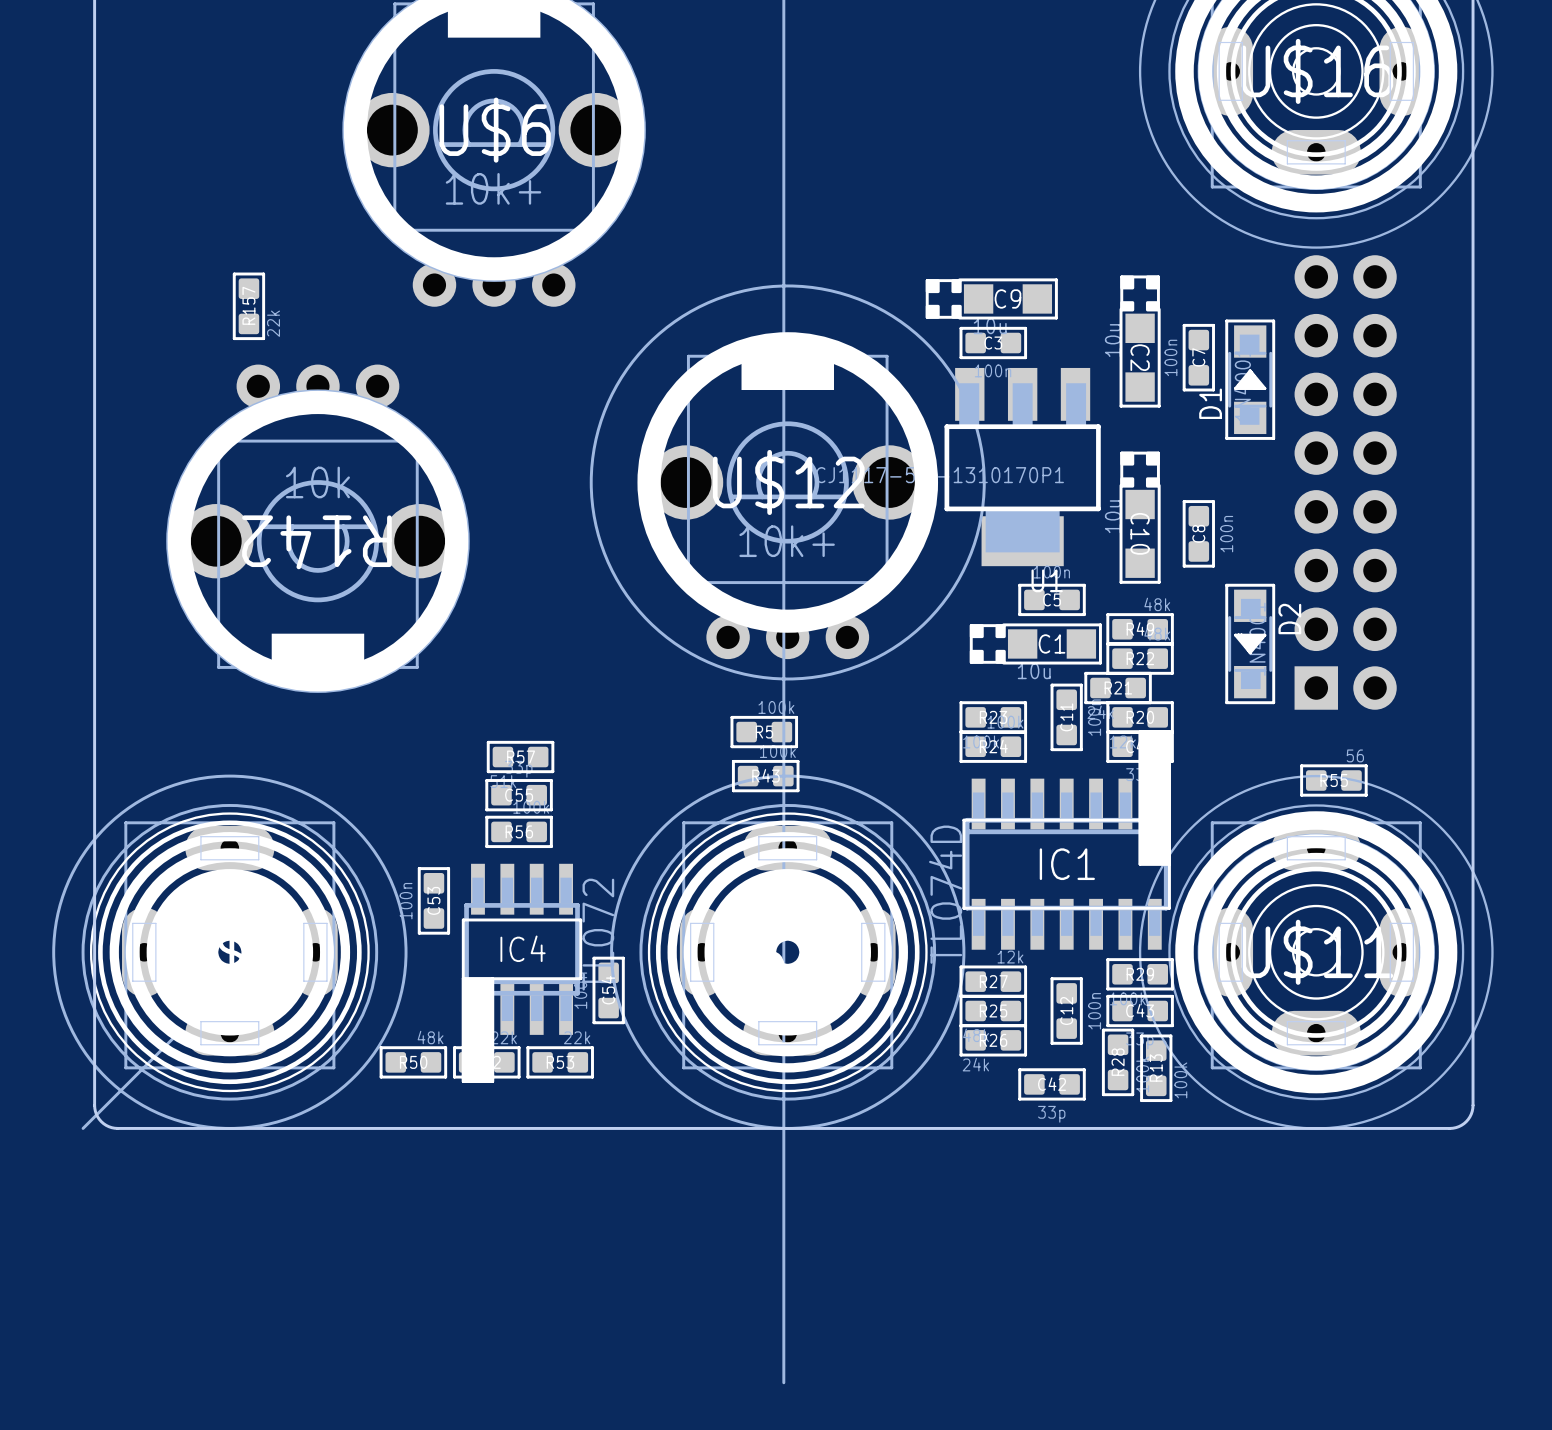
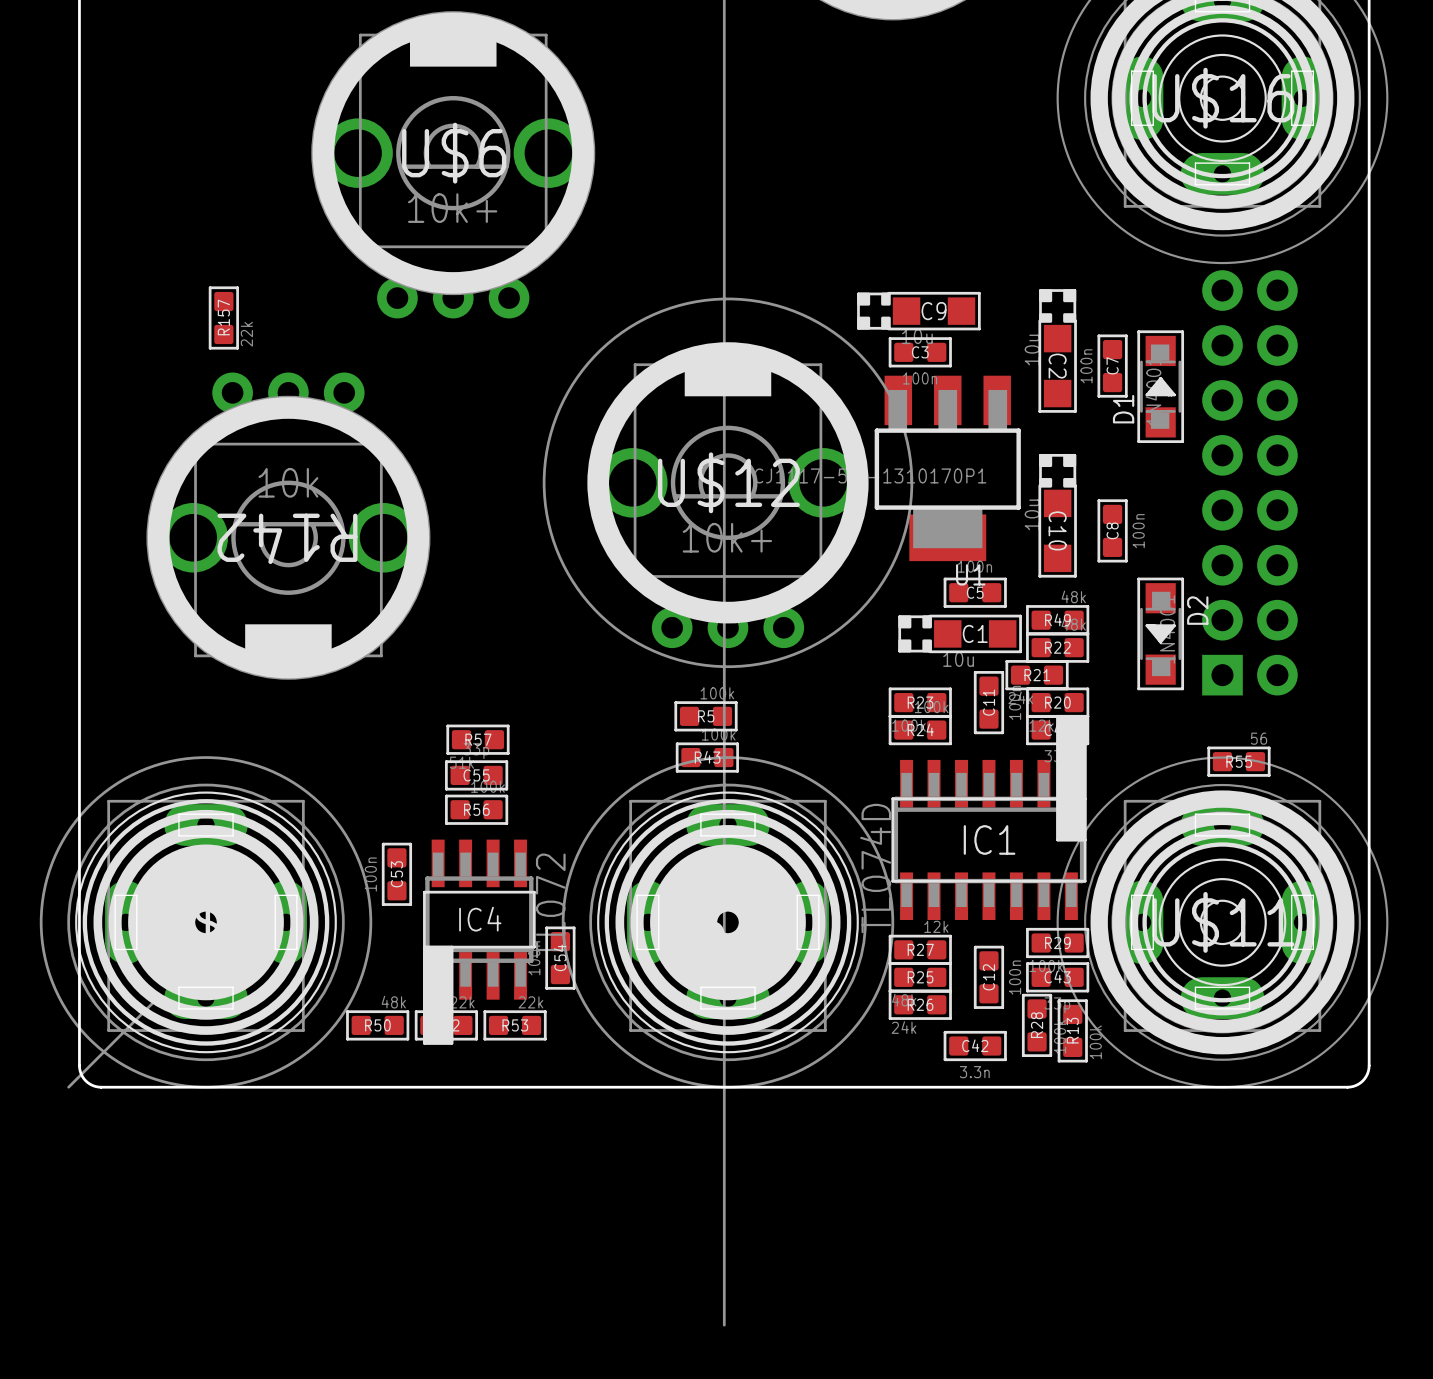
C42 value: 33p (1051, 1114) -> 3.3n (974, 1072)

